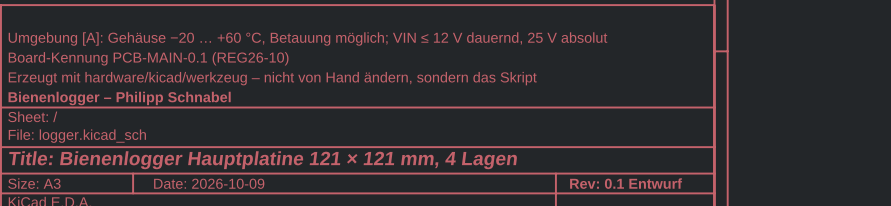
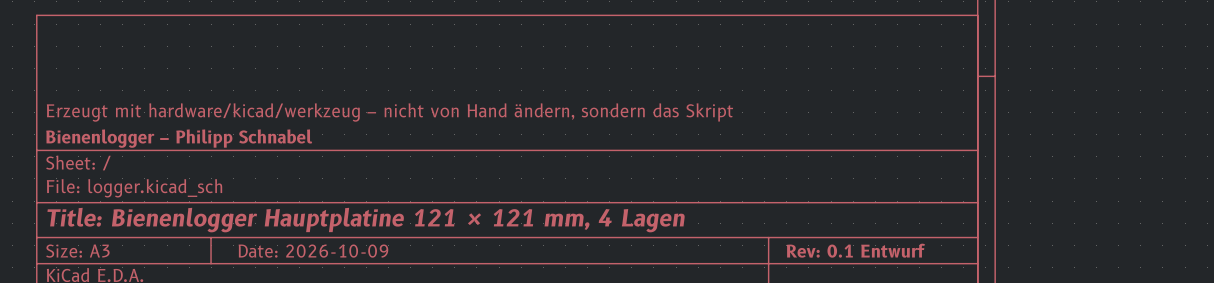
title block: Umgebung [A]: Gehäuse −20 … +60 °C, Betauung möglich; VIN ≤ 12 V dauernd, 25 V absolut (307, 38) -> none
title block: Board-Kennung PCB-MAIN-0.1 (REG26-10) (148, 58) -> none

